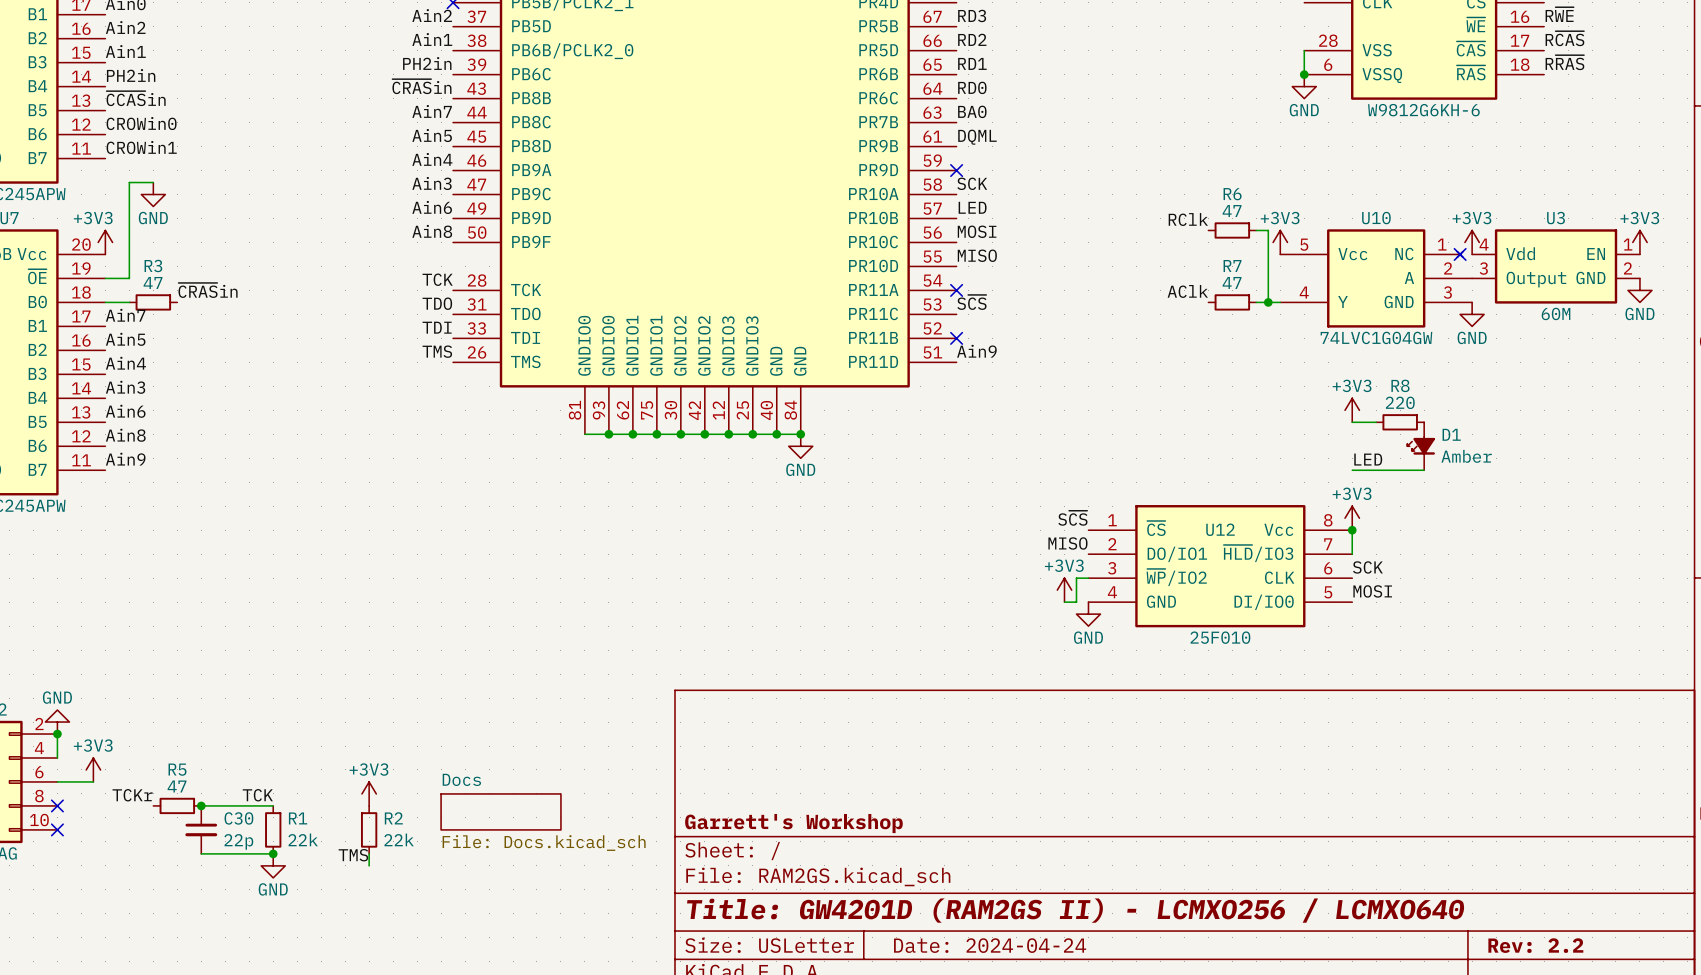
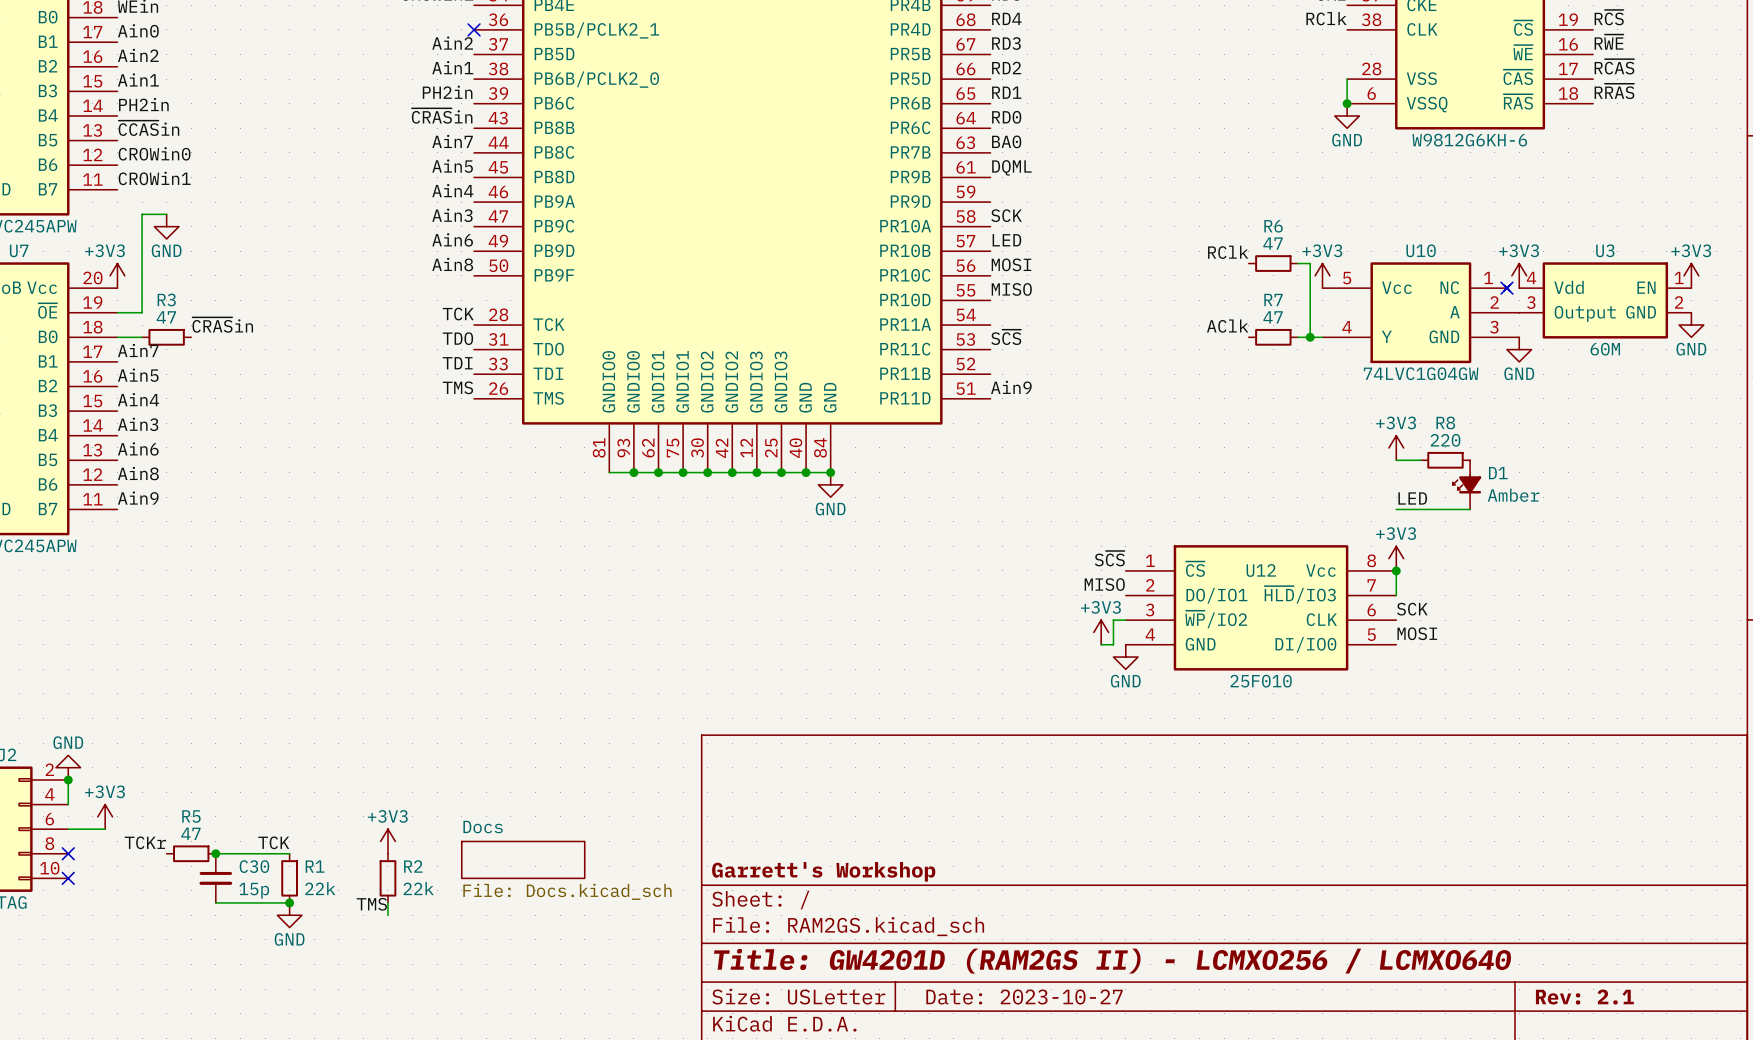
no-connect mark: (956, 170) -> none
no-connect mark: (956, 290) -> none
no-connect mark: (956, 338) -> none
C30 value: 22p (238, 841) -> 15p (254, 890)
title block: Date: 2024-04-24 (990, 945) -> Date: 2023-10-27 (1024, 997)
title block: Rev: 2.2 (1535, 945) -> Rev: 2.1 (1584, 997)

